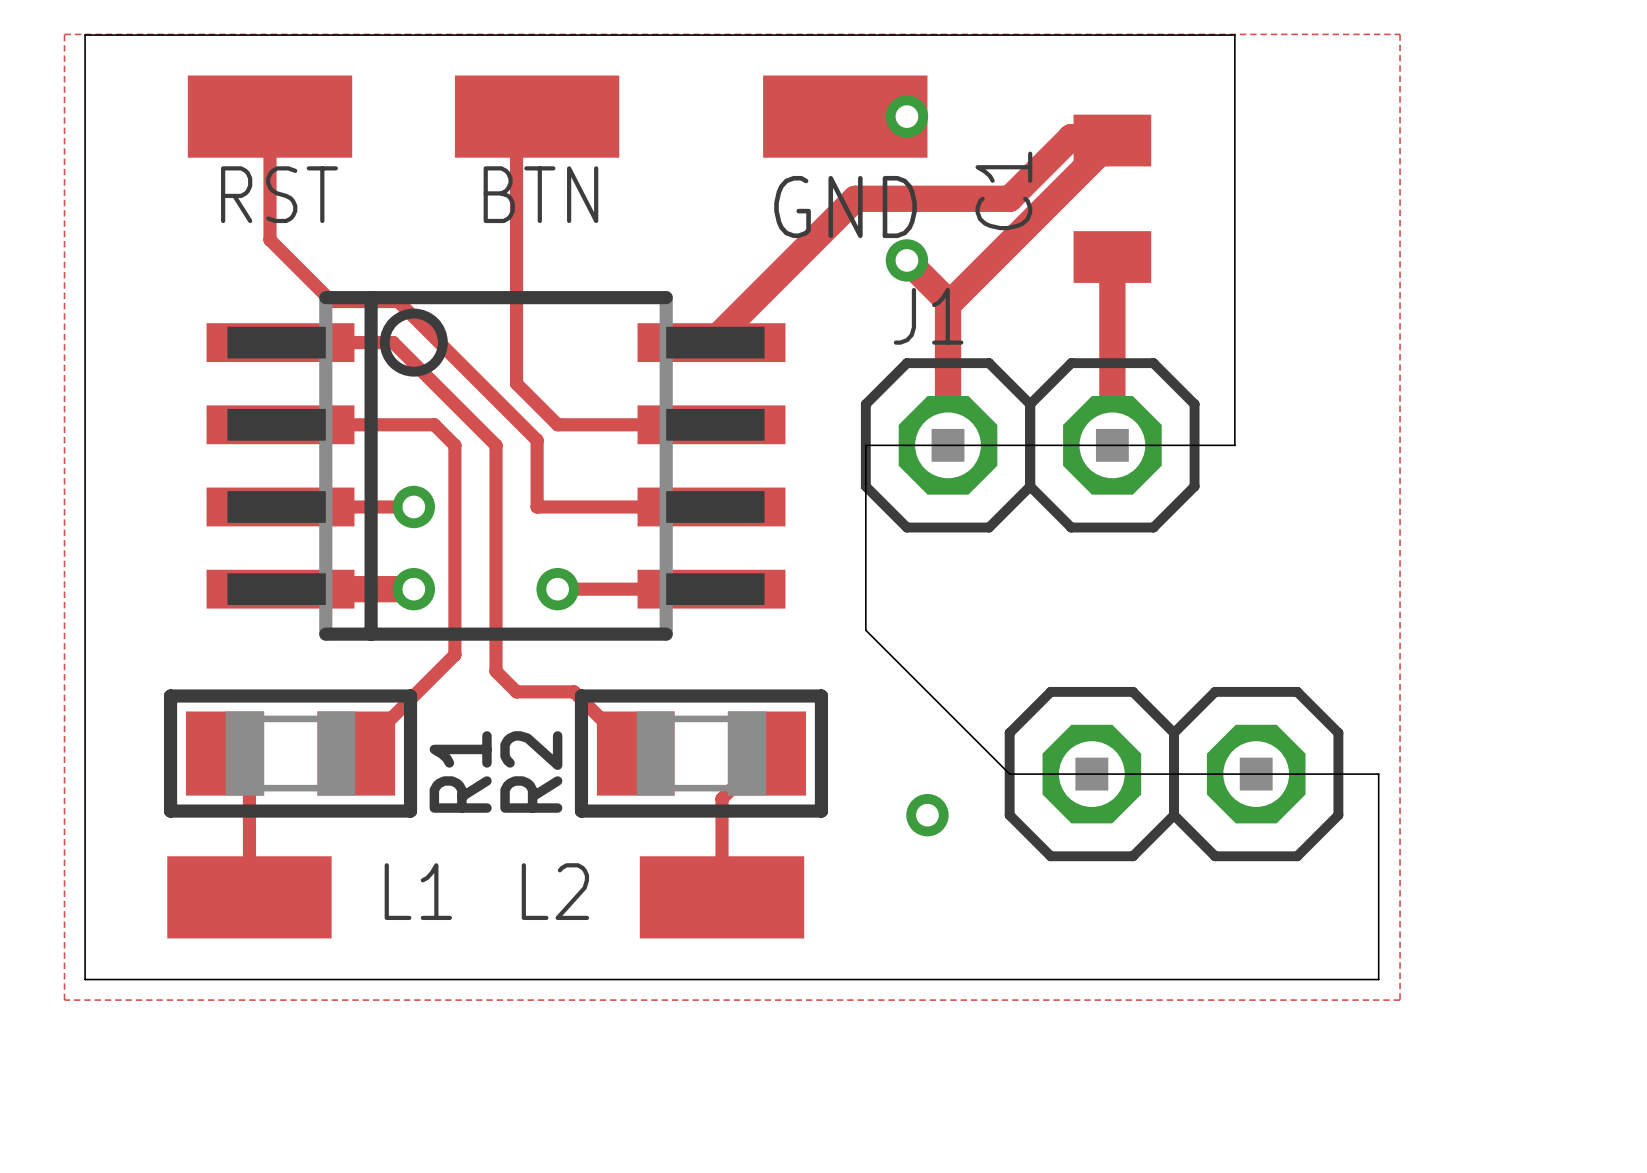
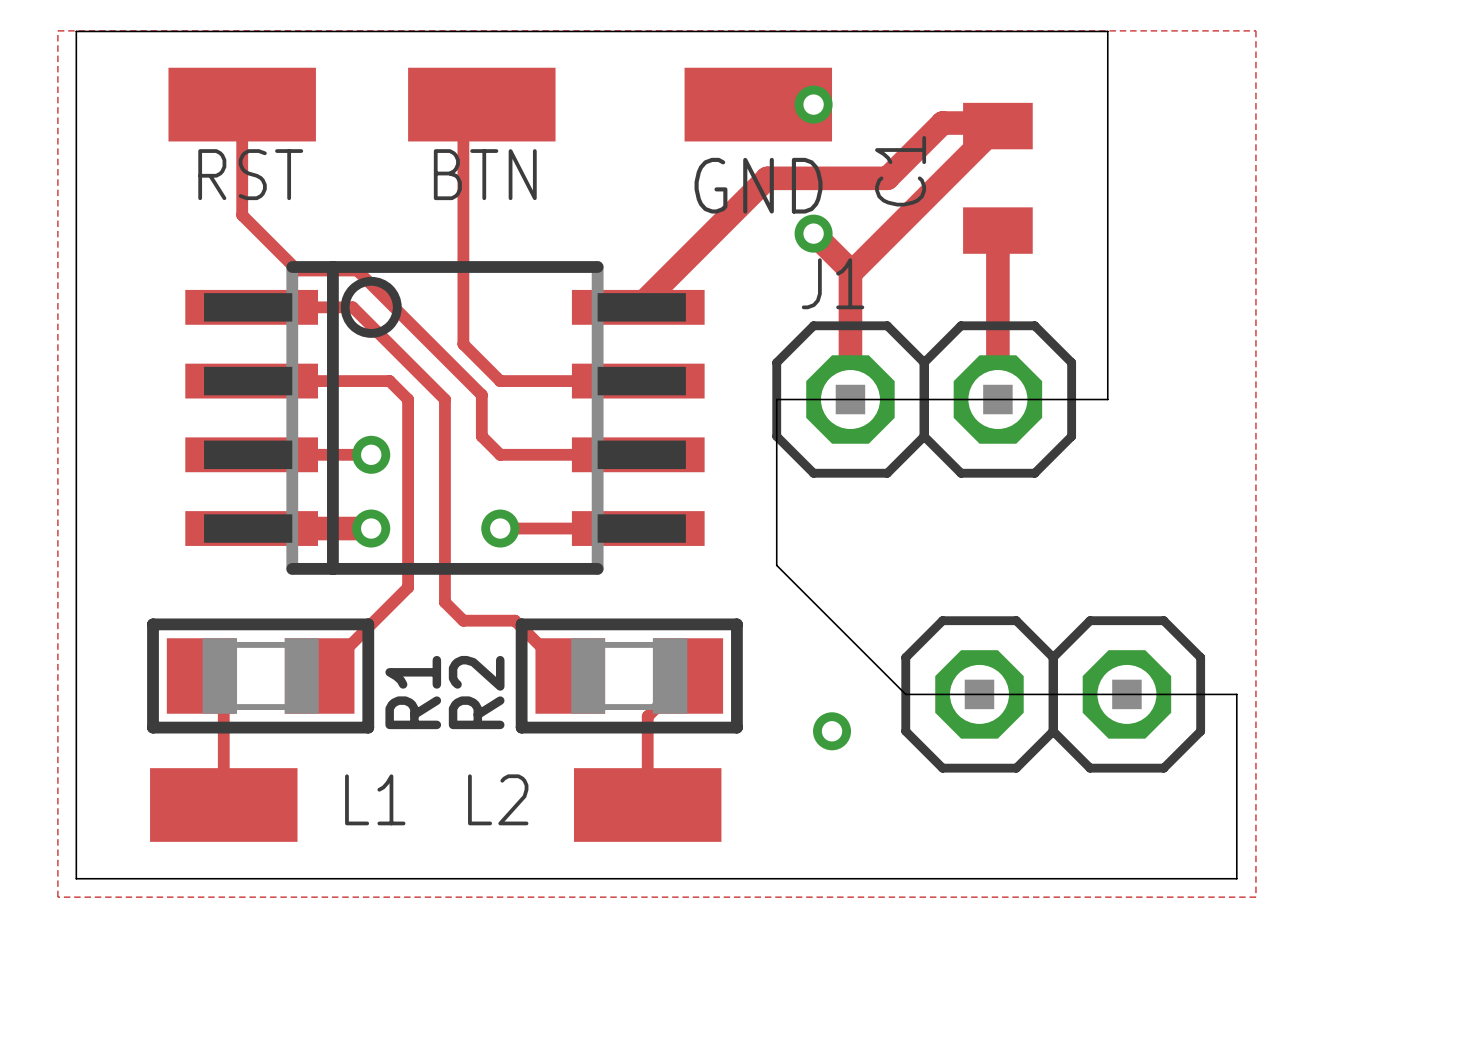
track: (1071, 137) (1009, 198) (989, 198) -> (961, 123) (942, 123) (887, 178)
track: (537, 486) (537, 506) (557, 506) -> (481, 436) (500, 454)

